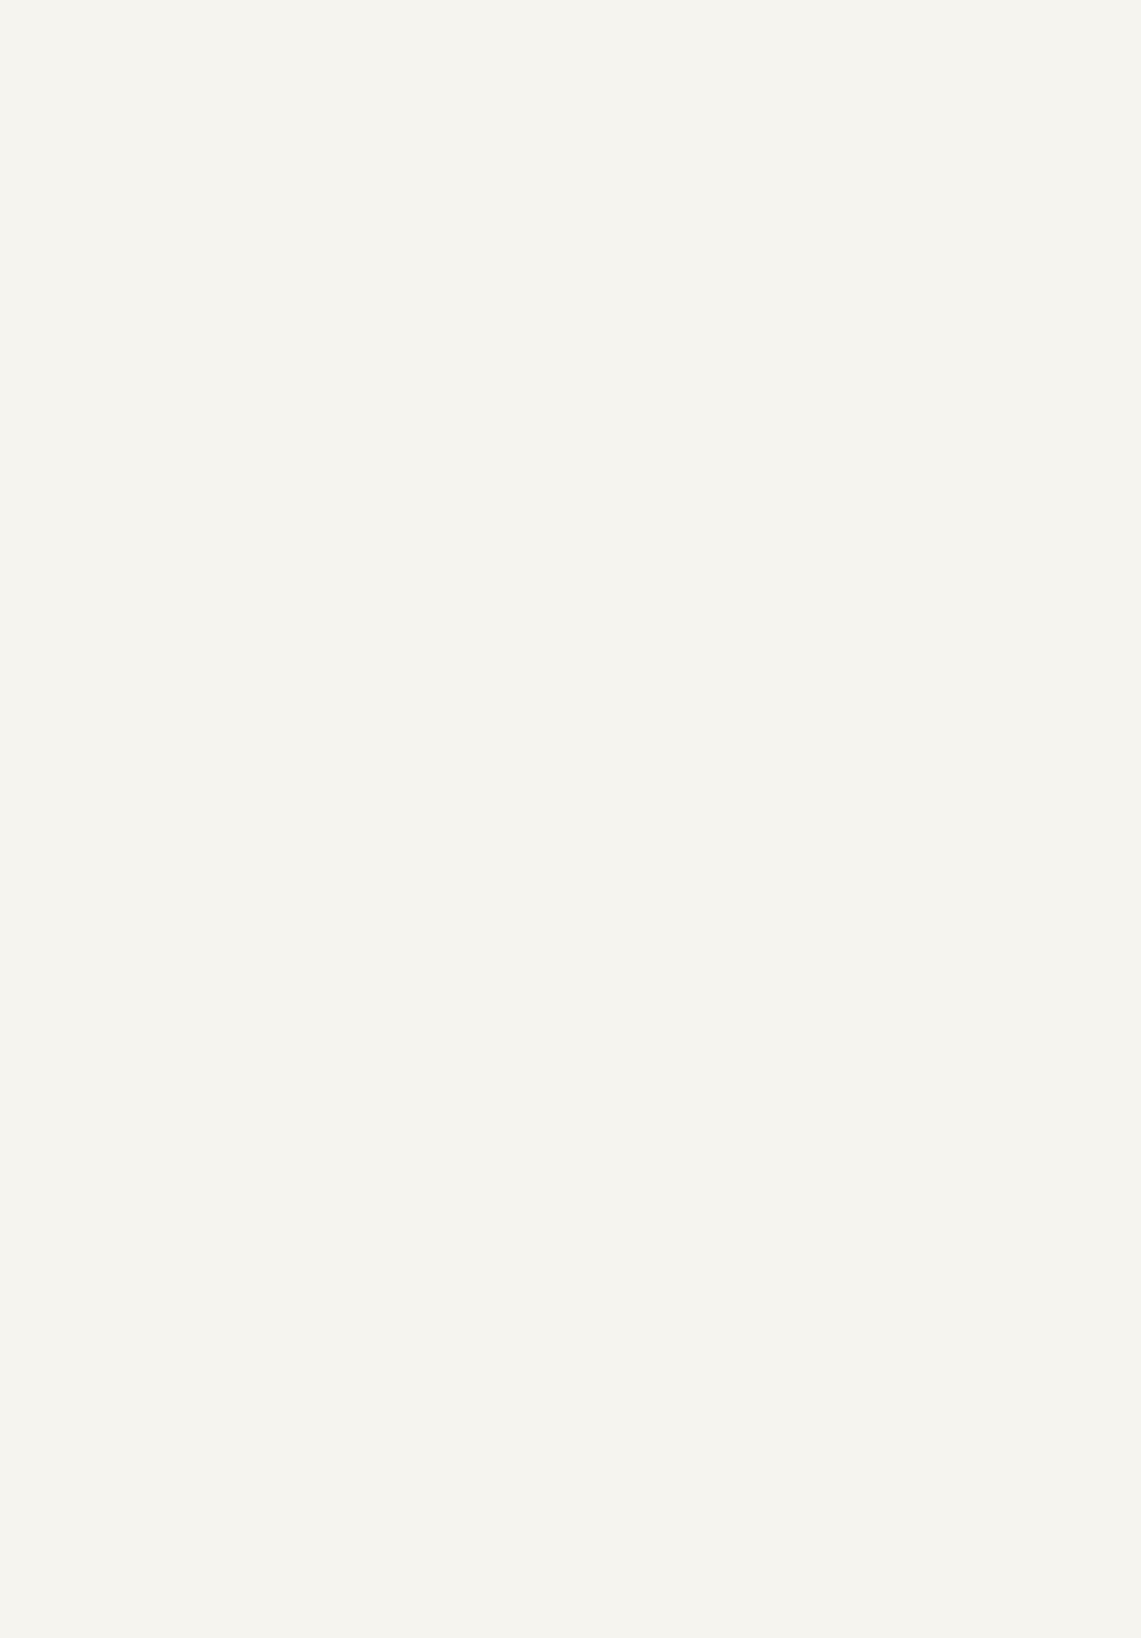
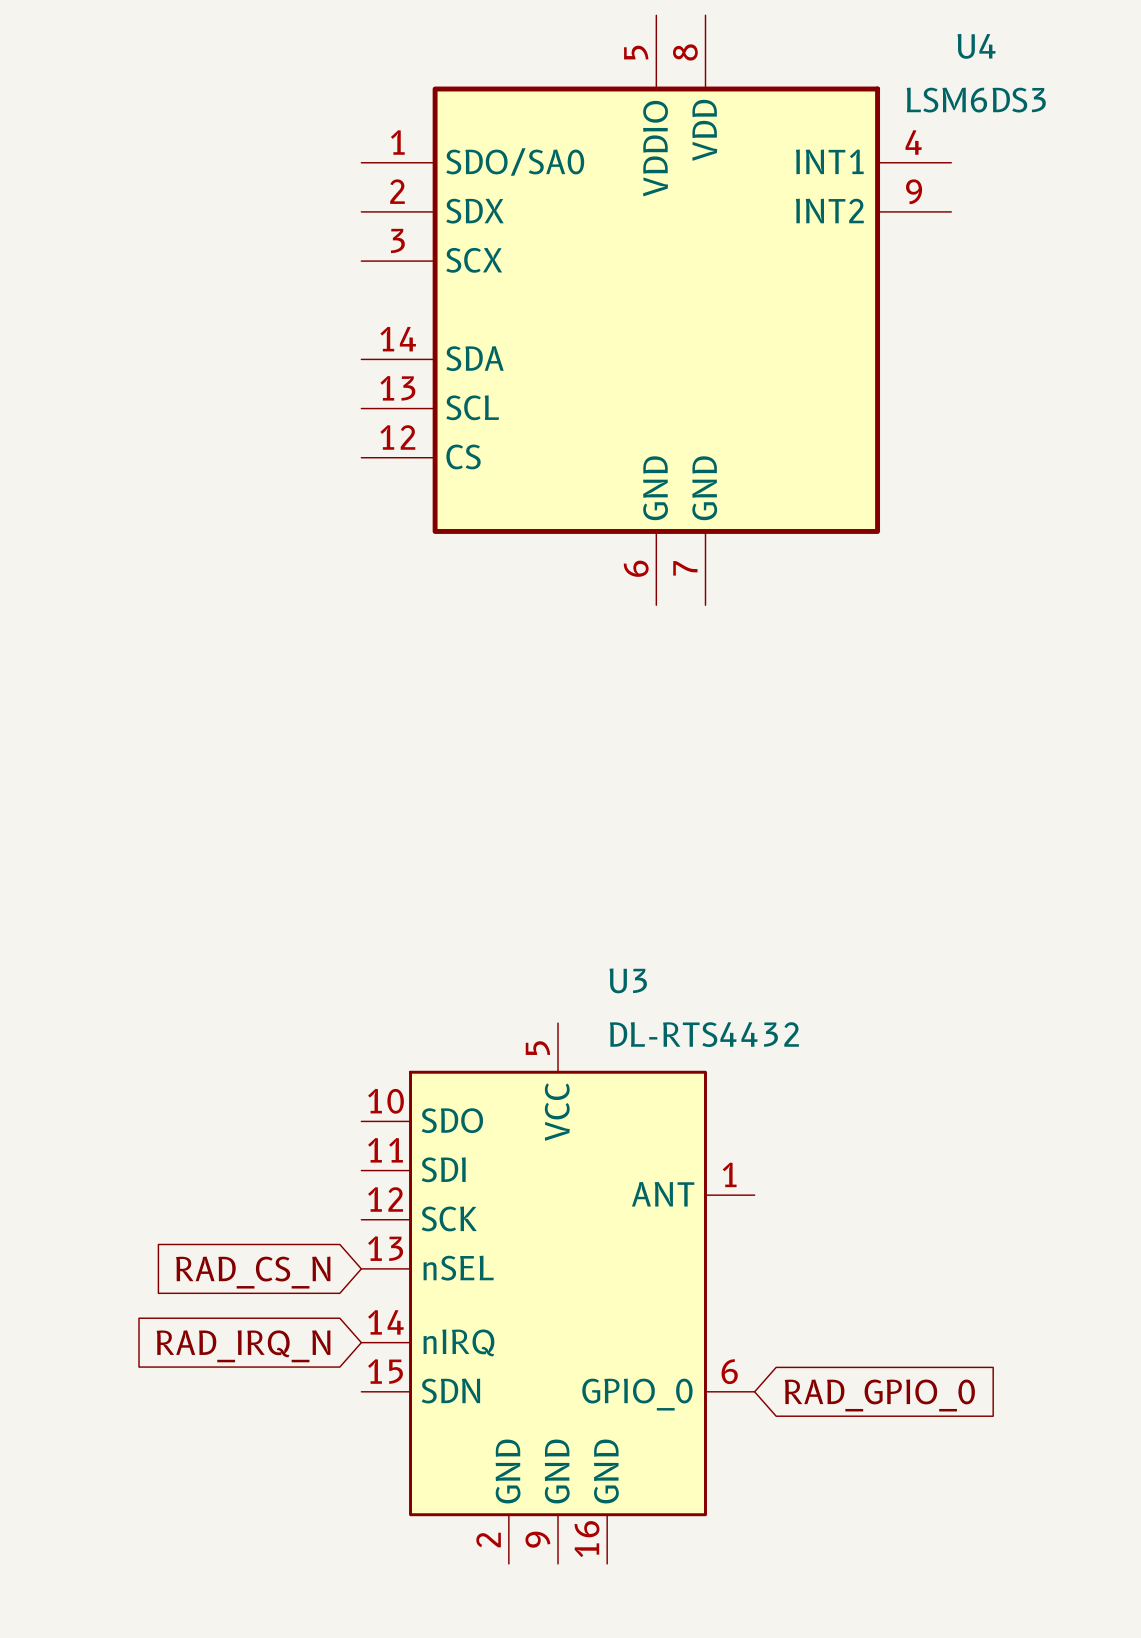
U4: none -> LSM6DS3 (656, 310)
global label: none -> RAD_CS_N (253, 1272)
U3: none -> DL-RTS4432 (558, 1293)
global label: none -> RAD_IRQ_N (243, 1346)
global label: none -> RAD_GPIO_0 (879, 1395)

